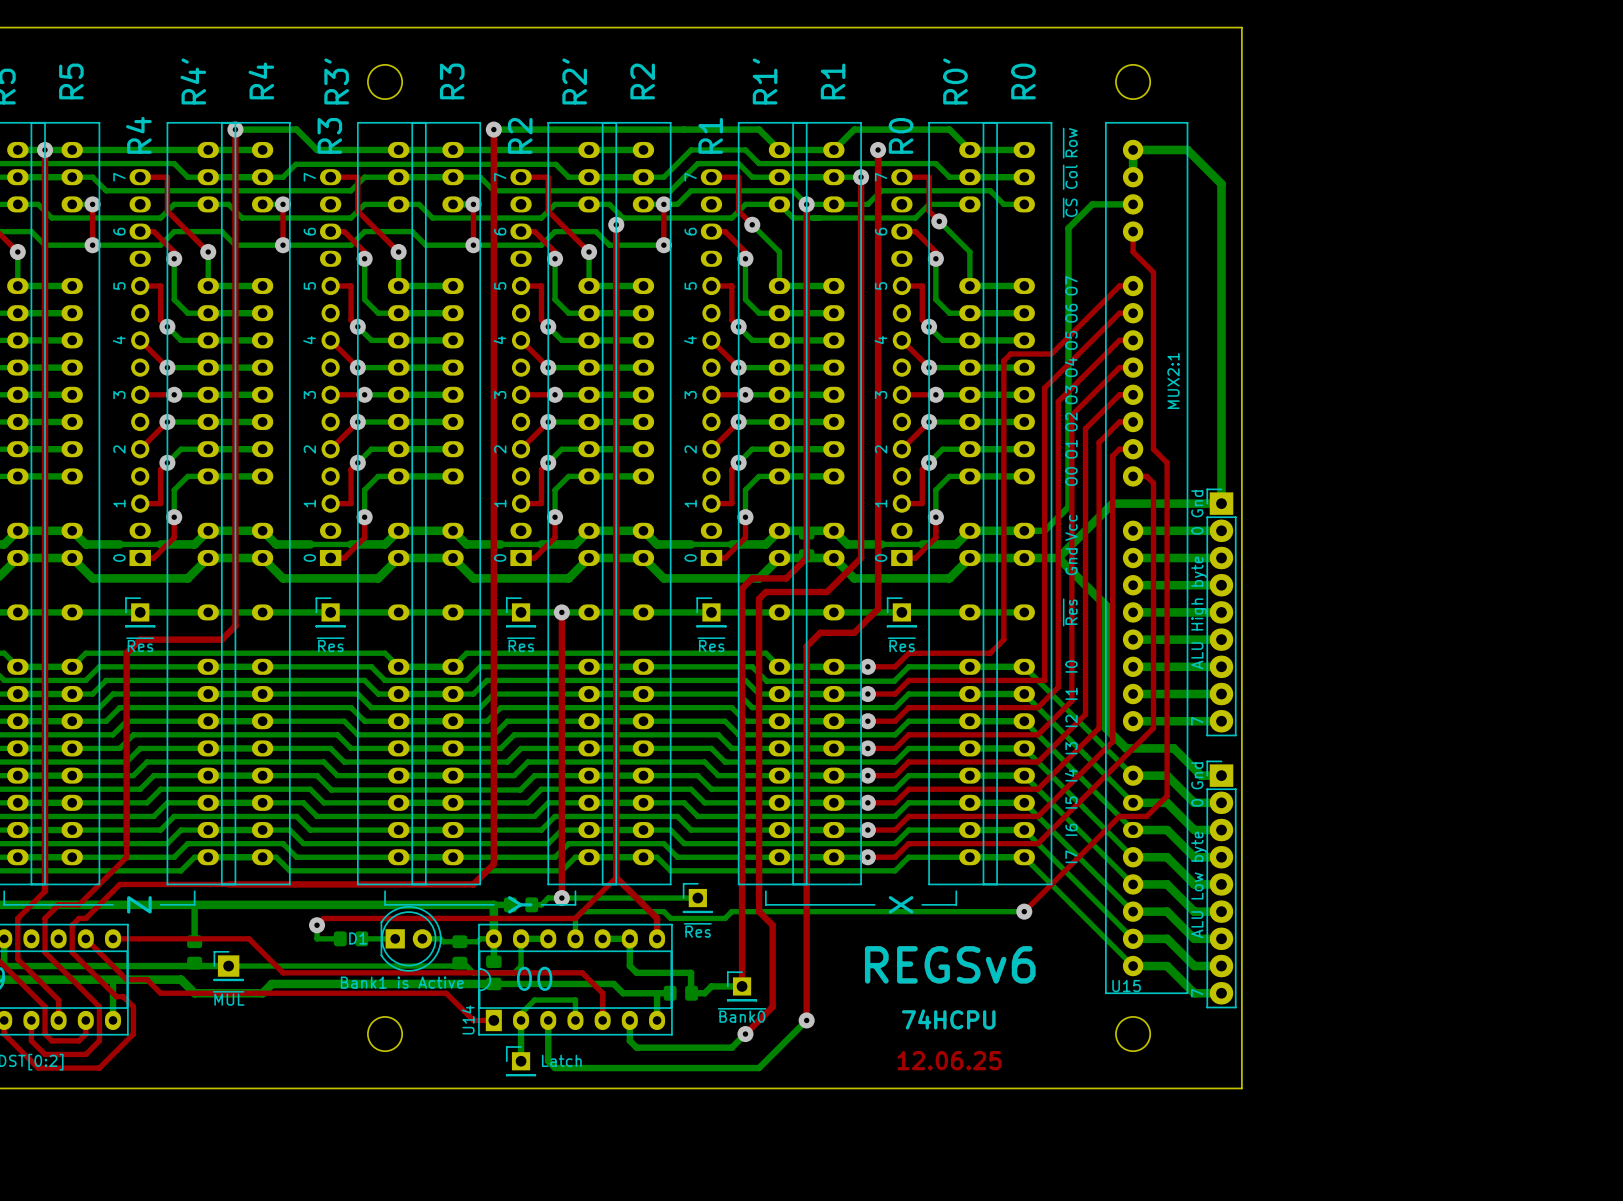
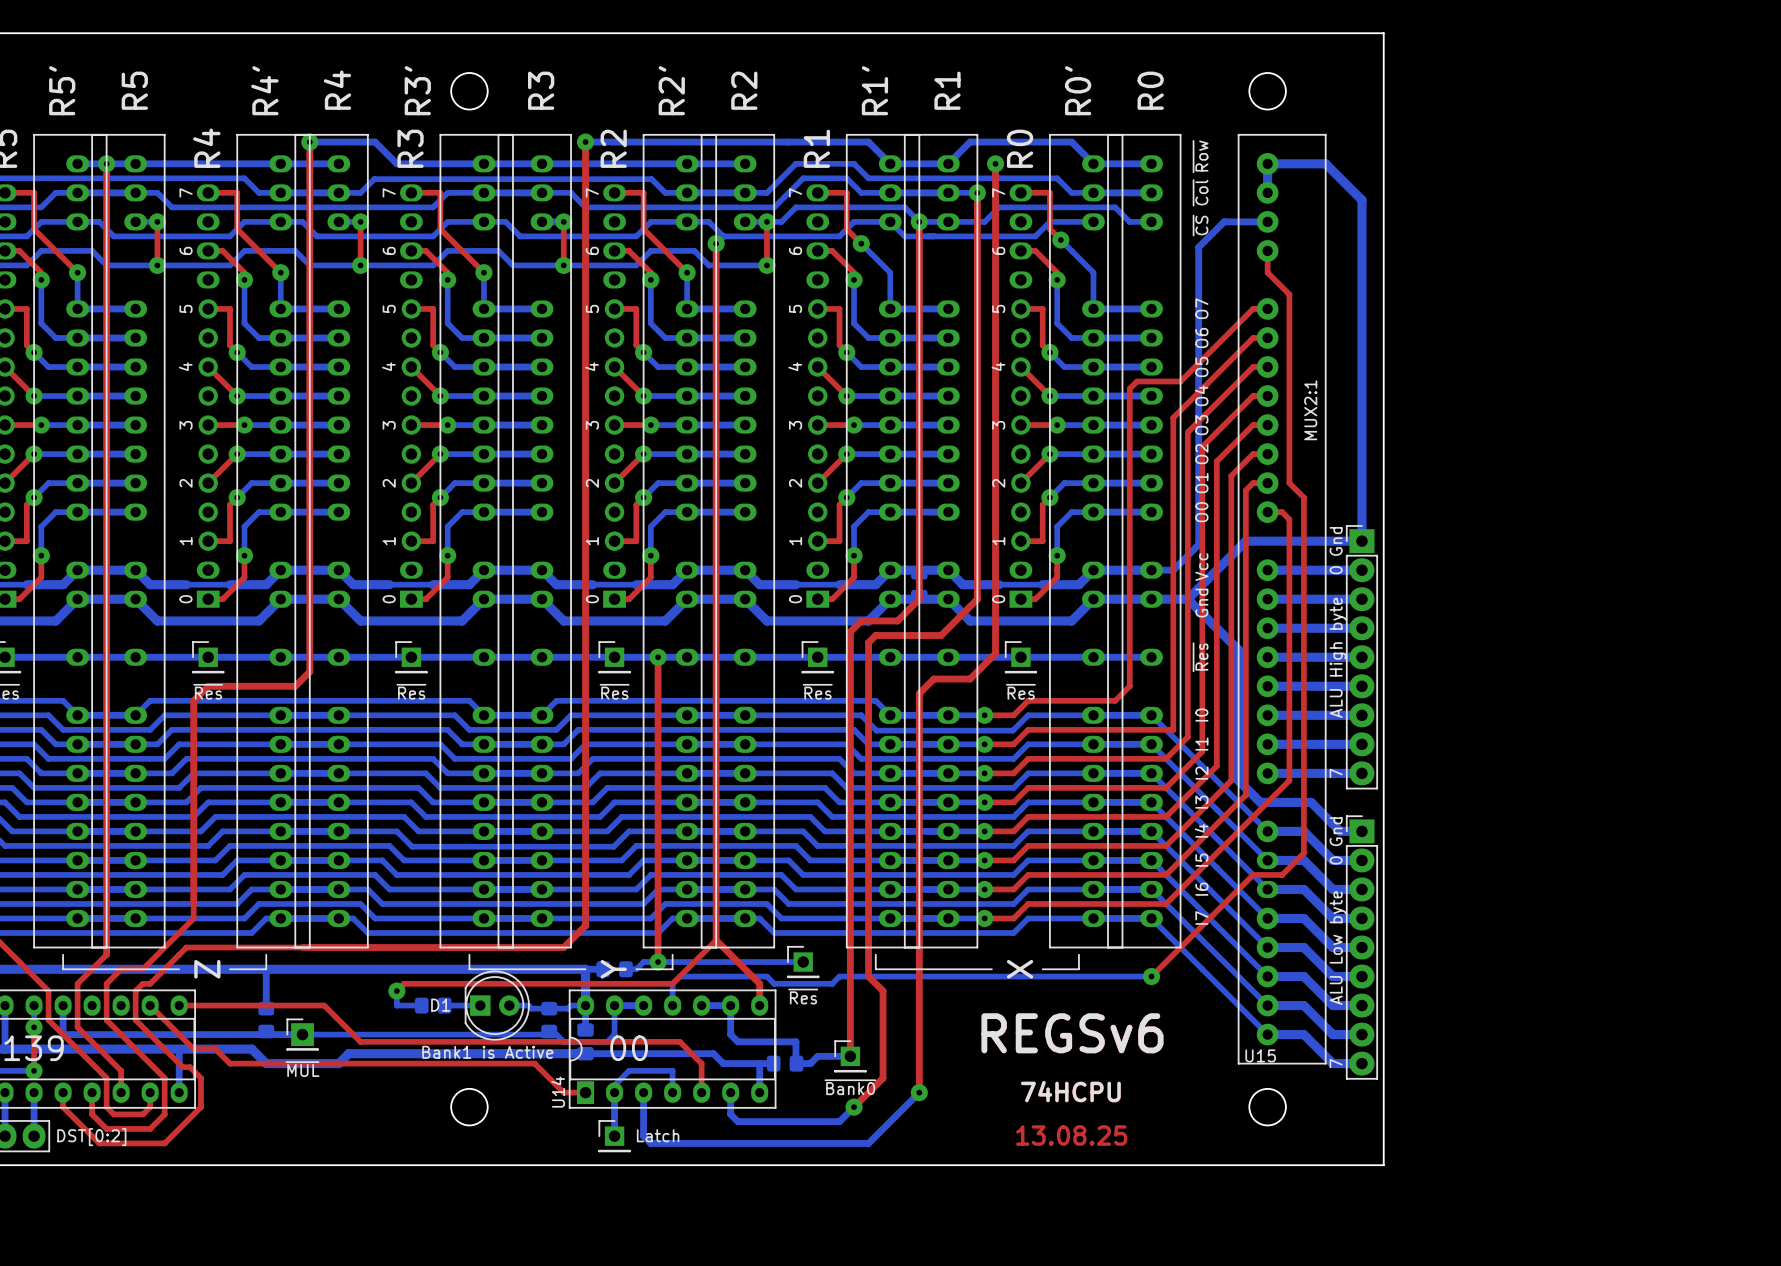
text: 12.06.25 (949, 1060) -> 13.08.25 (1071, 1135)

